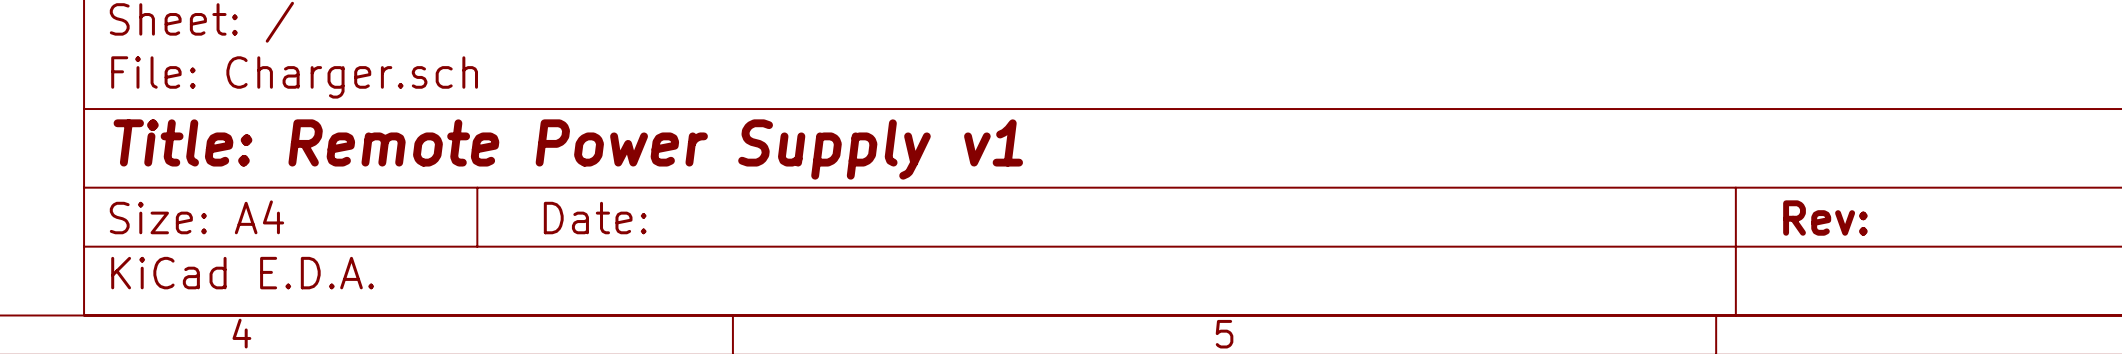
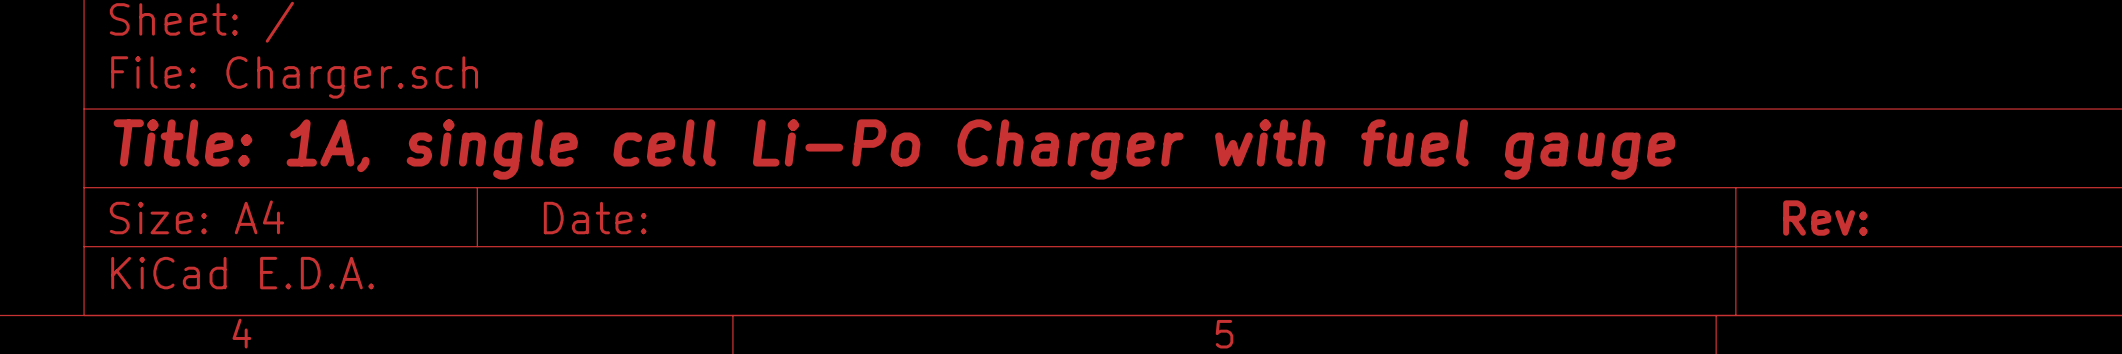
title block: Title: Remote Power Supply v1 (568, 149) -> Title: 1A, single cell Li-Po Charger with fuel gauge (894, 149)

